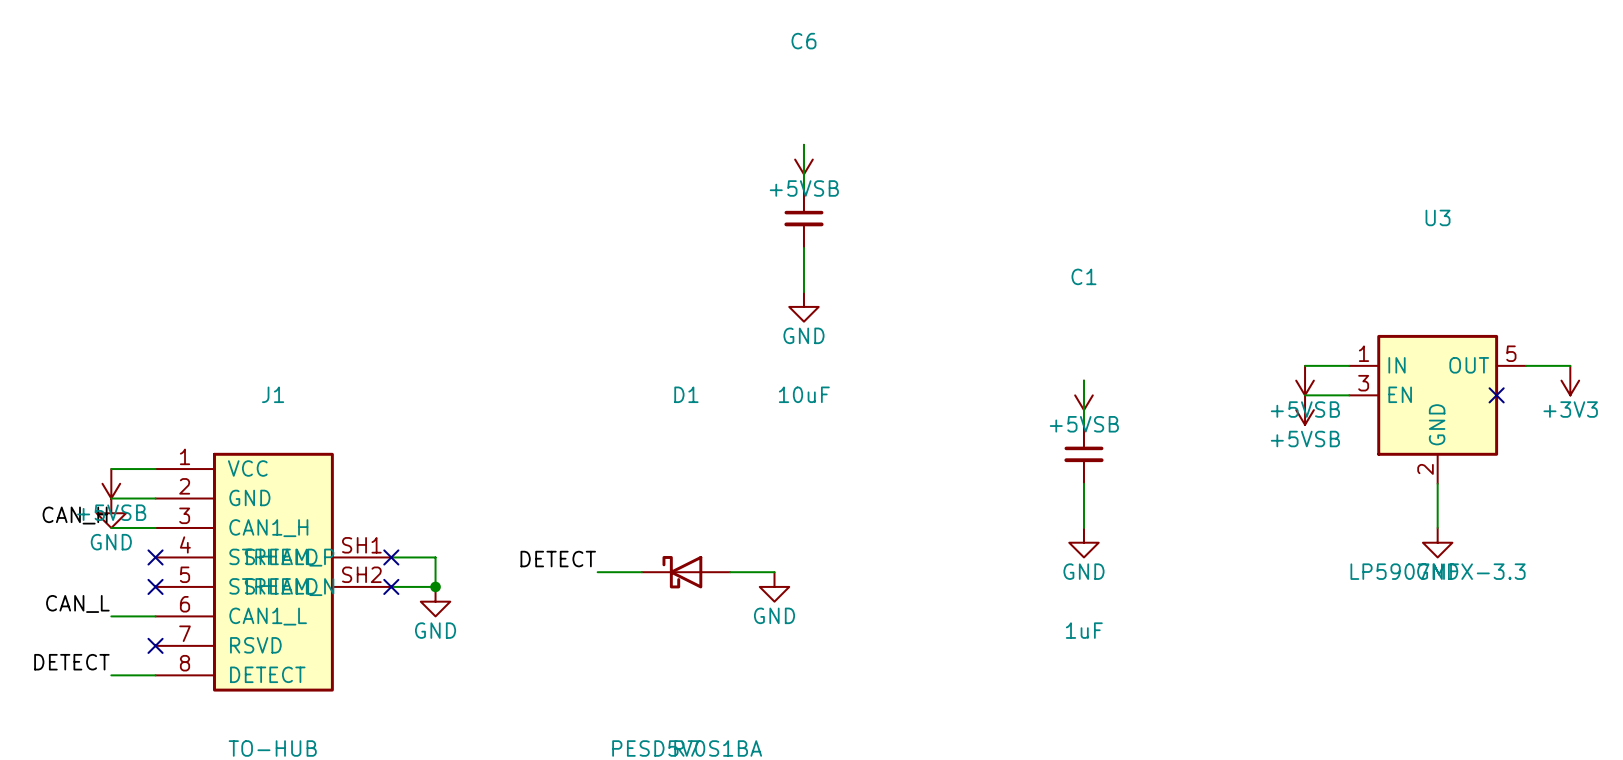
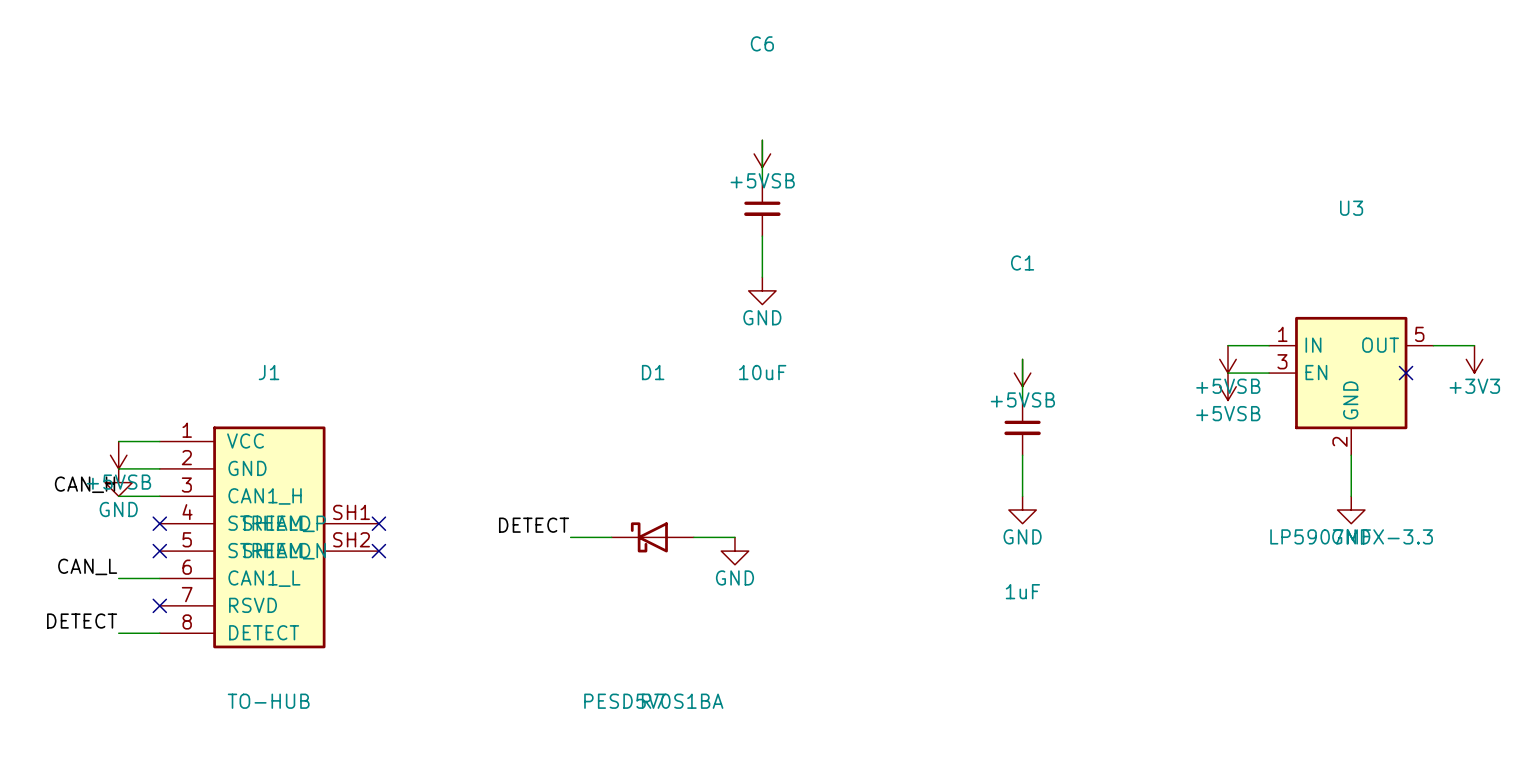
wire: (391, 557) (435, 557) (435, 586) (391, 586) -> none
junction: (435, 586) -> none
power symbol: GND (435, 601) -> none

